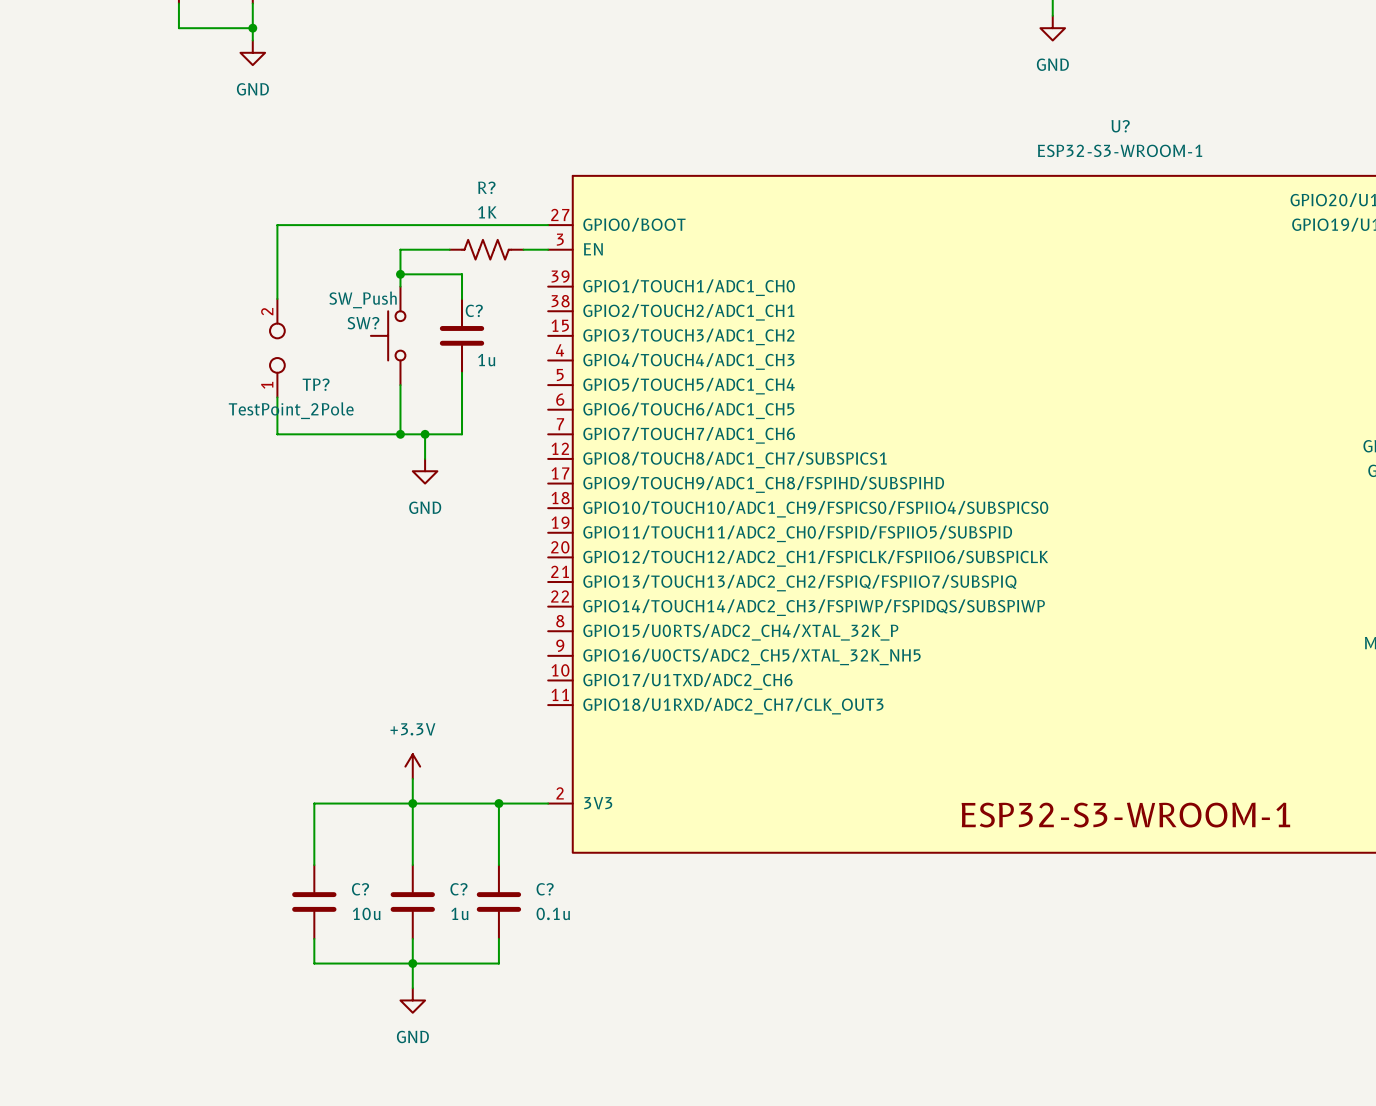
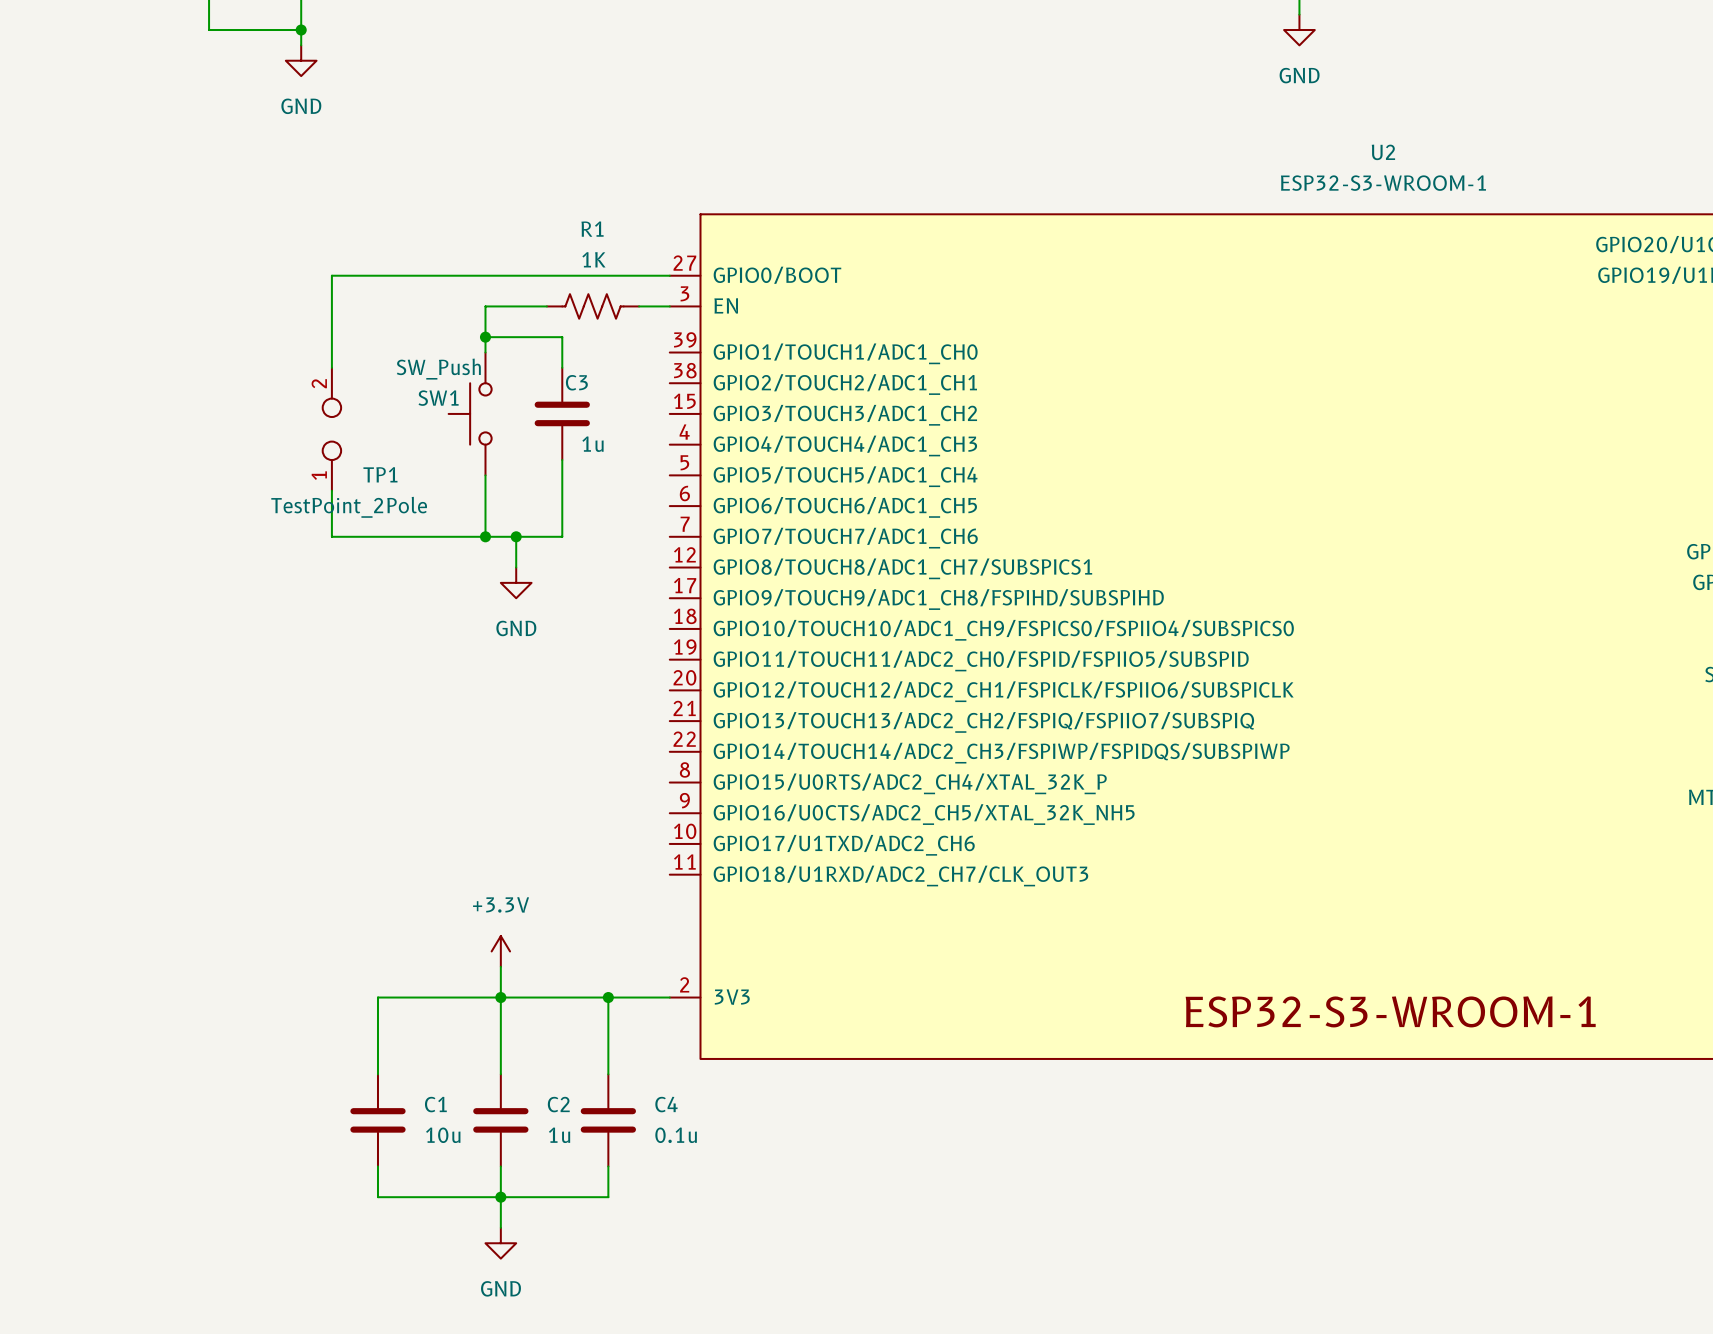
U? name: U? (1120, 126) -> U2 (1383, 152)
R? name: R? (486, 187) -> R1 (592, 229)
C? name: C? (474, 310) -> C3 (576, 382)
SW? name: SW? (363, 323) -> SW1 (438, 398)
TP? name: TP? (316, 384) -> TP1 (380, 474)
C? name: C? (360, 889) -> C1 (435, 1104)
C? name: C? (458, 889) -> C2 (558, 1104)
C? name: C? (545, 889) -> C4 (666, 1104)

